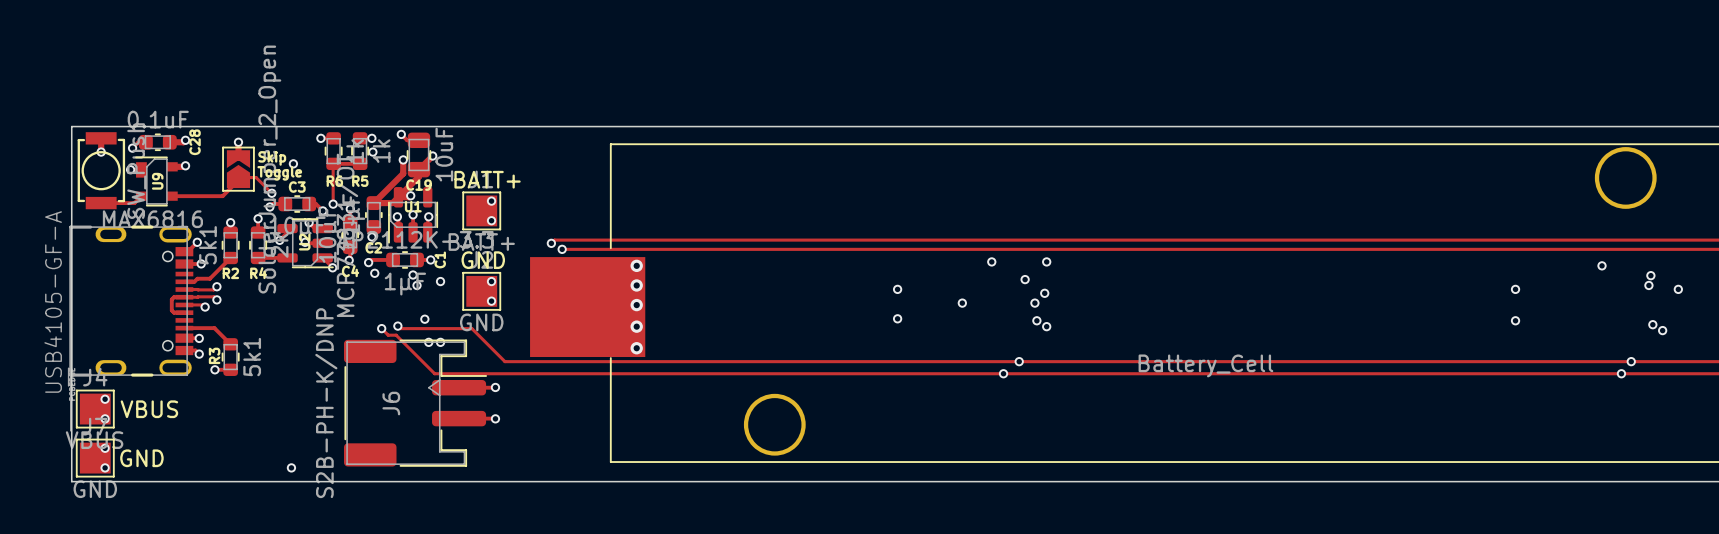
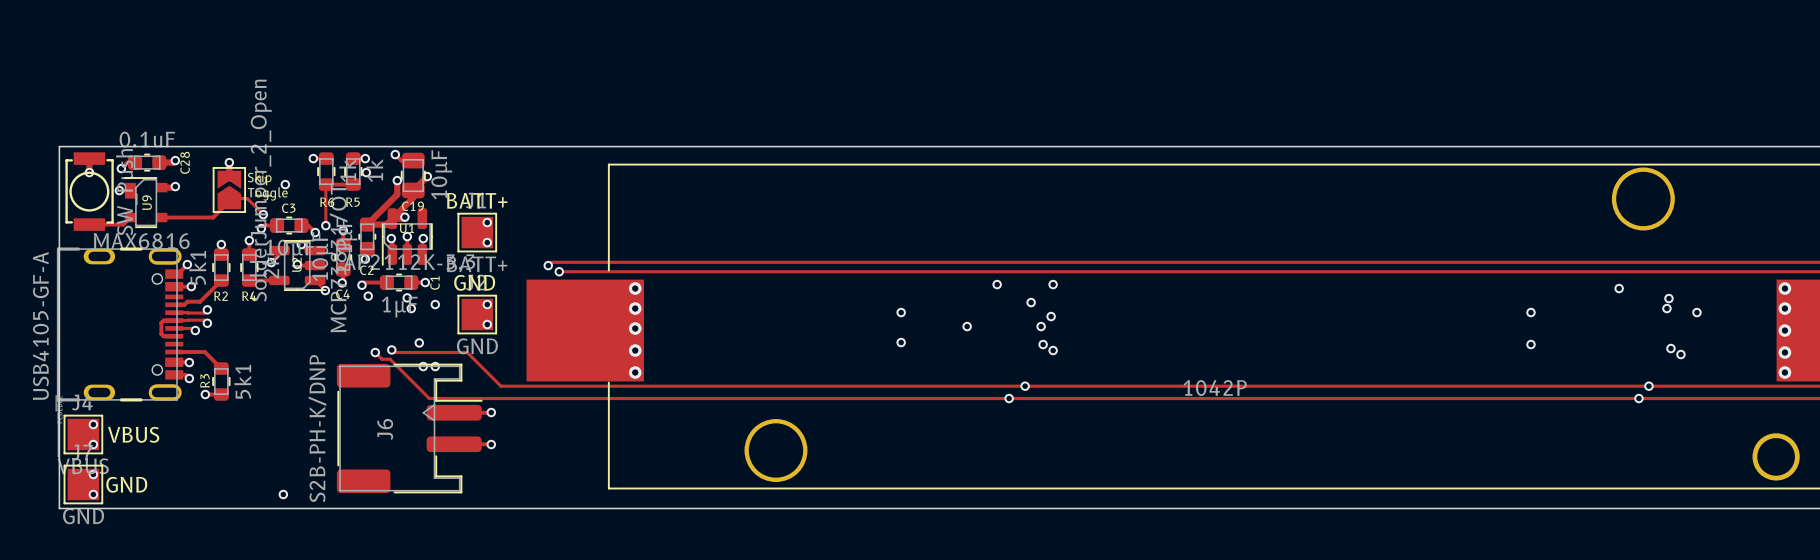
C19 value: 10uF (444, 154) -> 10µF (441, 174)
part value: Battery_Cell (1205, 365) -> 1042P (1215, 388)

